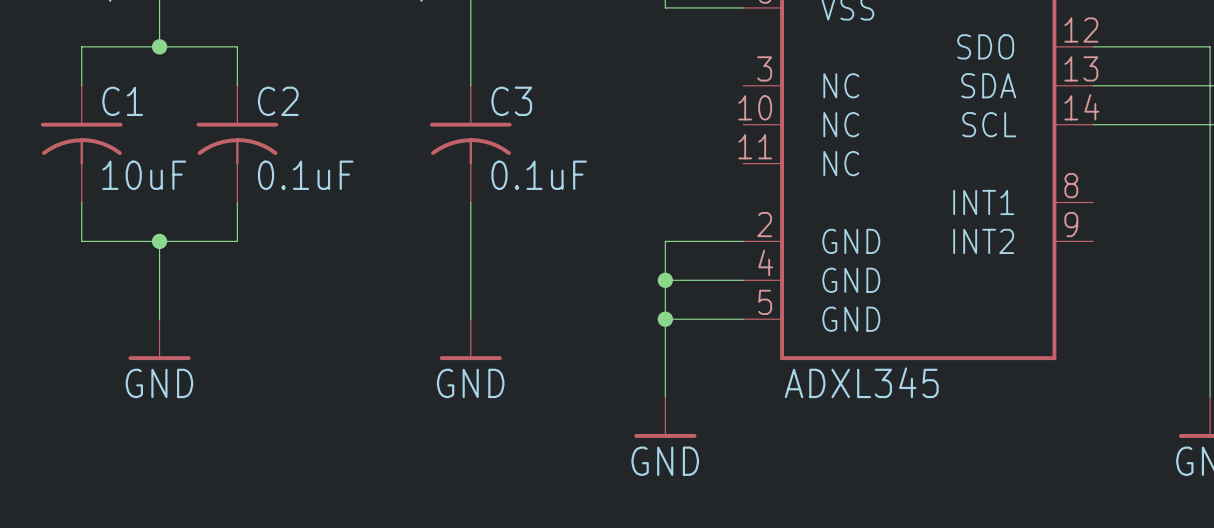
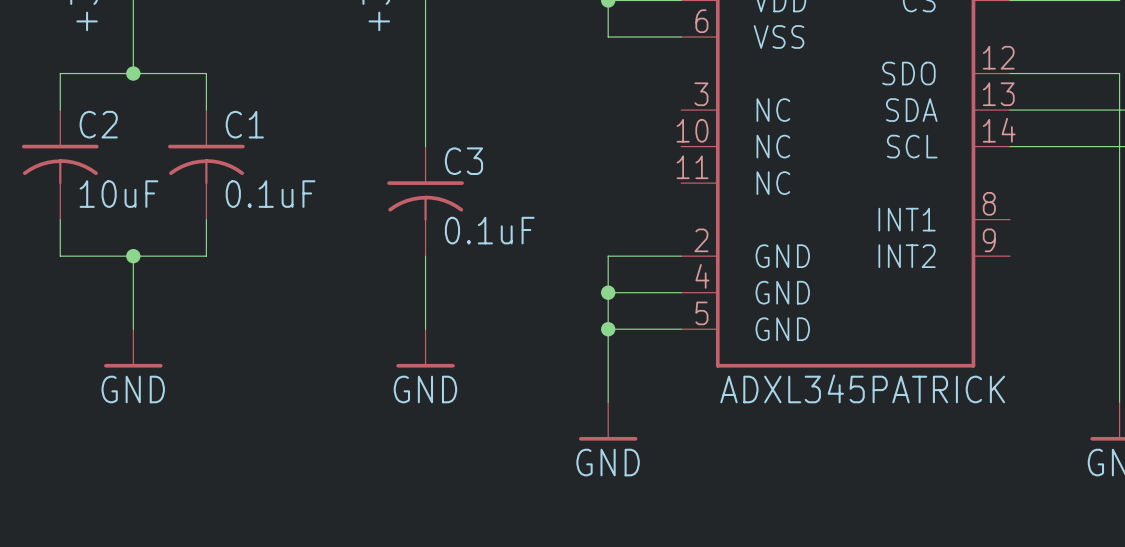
C1 name: C1 (122, 101) -> C2 (98, 124)
C2 name: C2 (278, 101) -> C1 (244, 124)
C3 position: (470, 144) -> (425, 201)
part value: ADXL345 (861, 382) -> ADXL345PATRICK (862, 388)

